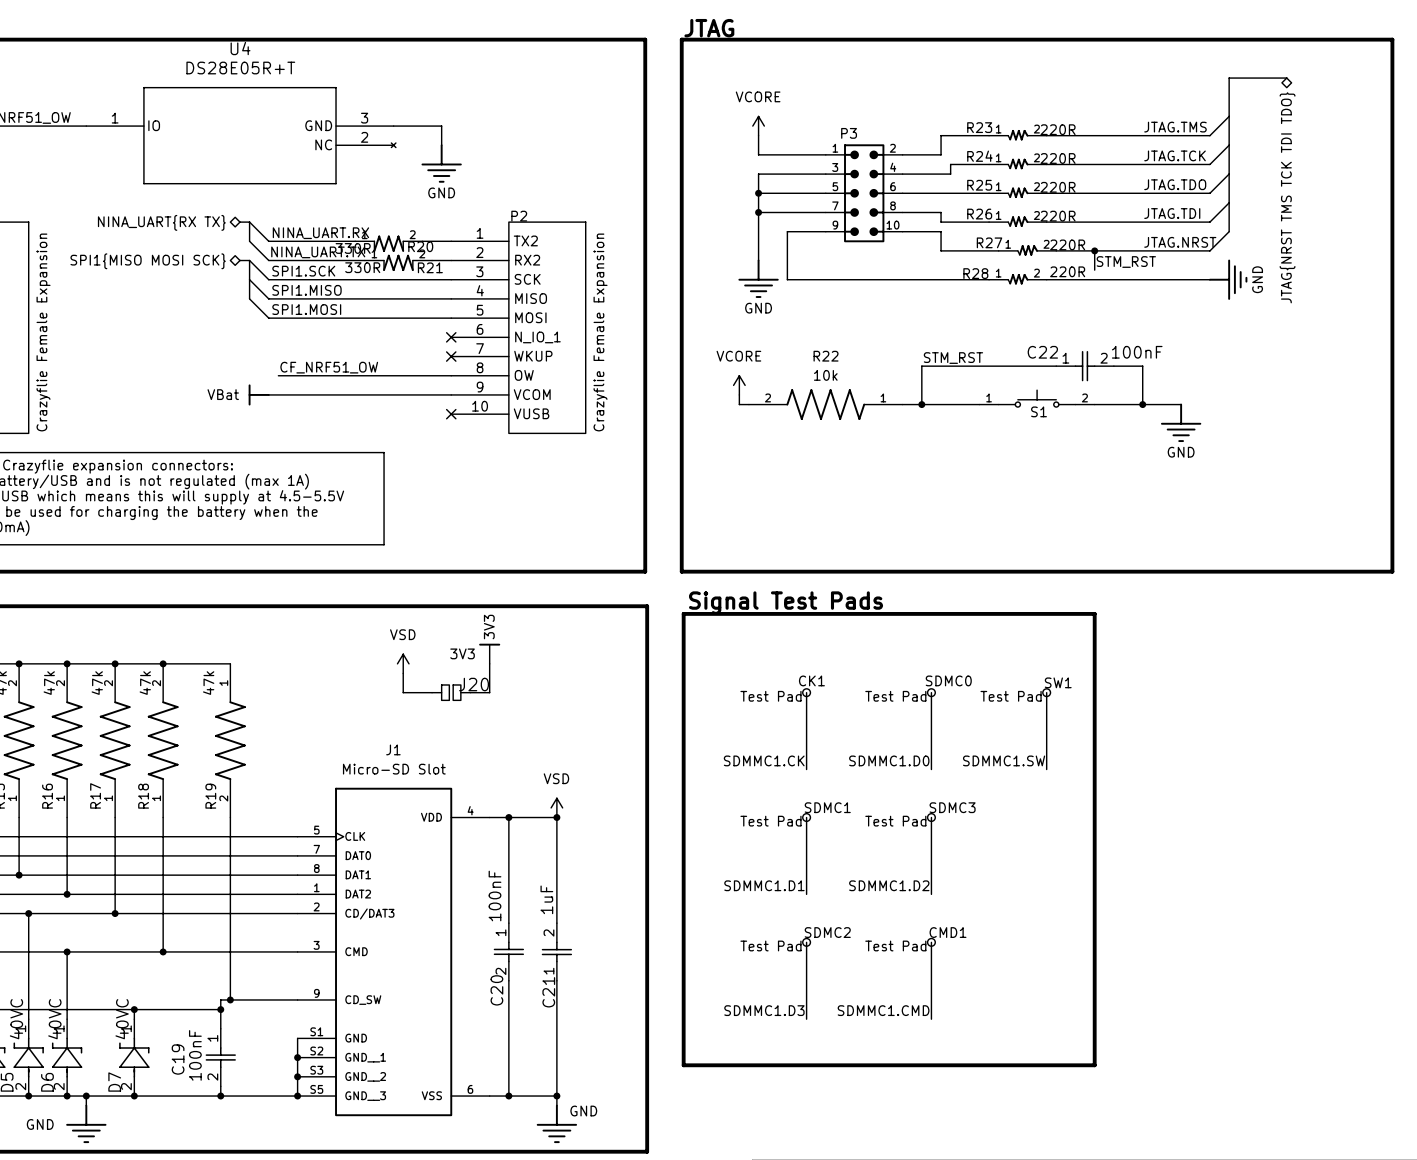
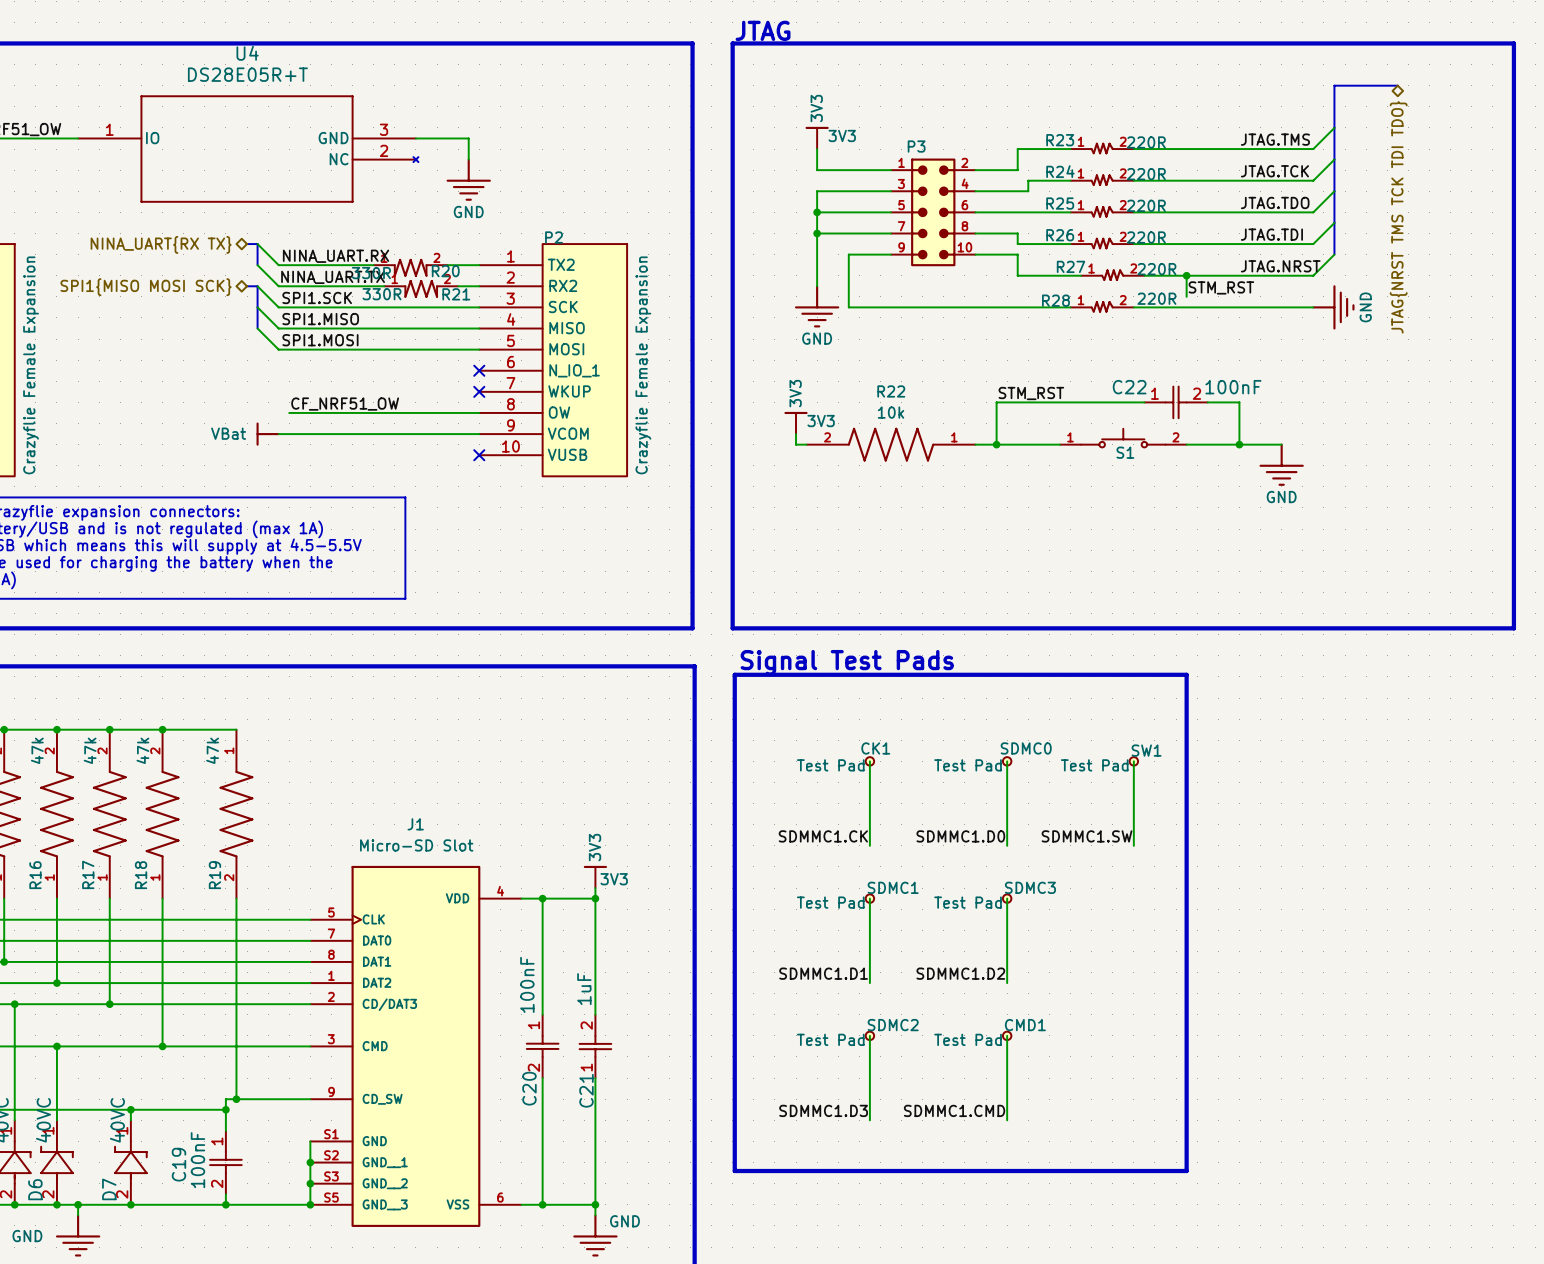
power symbol: VCORE (758, 126) -> 3V3 (817, 137)
power symbol: VCORE (739, 385) -> 3V3 (796, 423)
power symbol text position: 3V3 (462, 653) -> 3V3 (614, 879)
power symbol position: 3V3 (489, 653) -> 3V3 (595, 876)
power symbol: VSD (403, 663) -> none
wire: (489, 663) (489, 692) (470, 692) -> none
wire: (403, 673) (403, 692) (432, 692) -> none
J20: (451, 692) -> none
power symbol: VSD (556, 807) -> none

